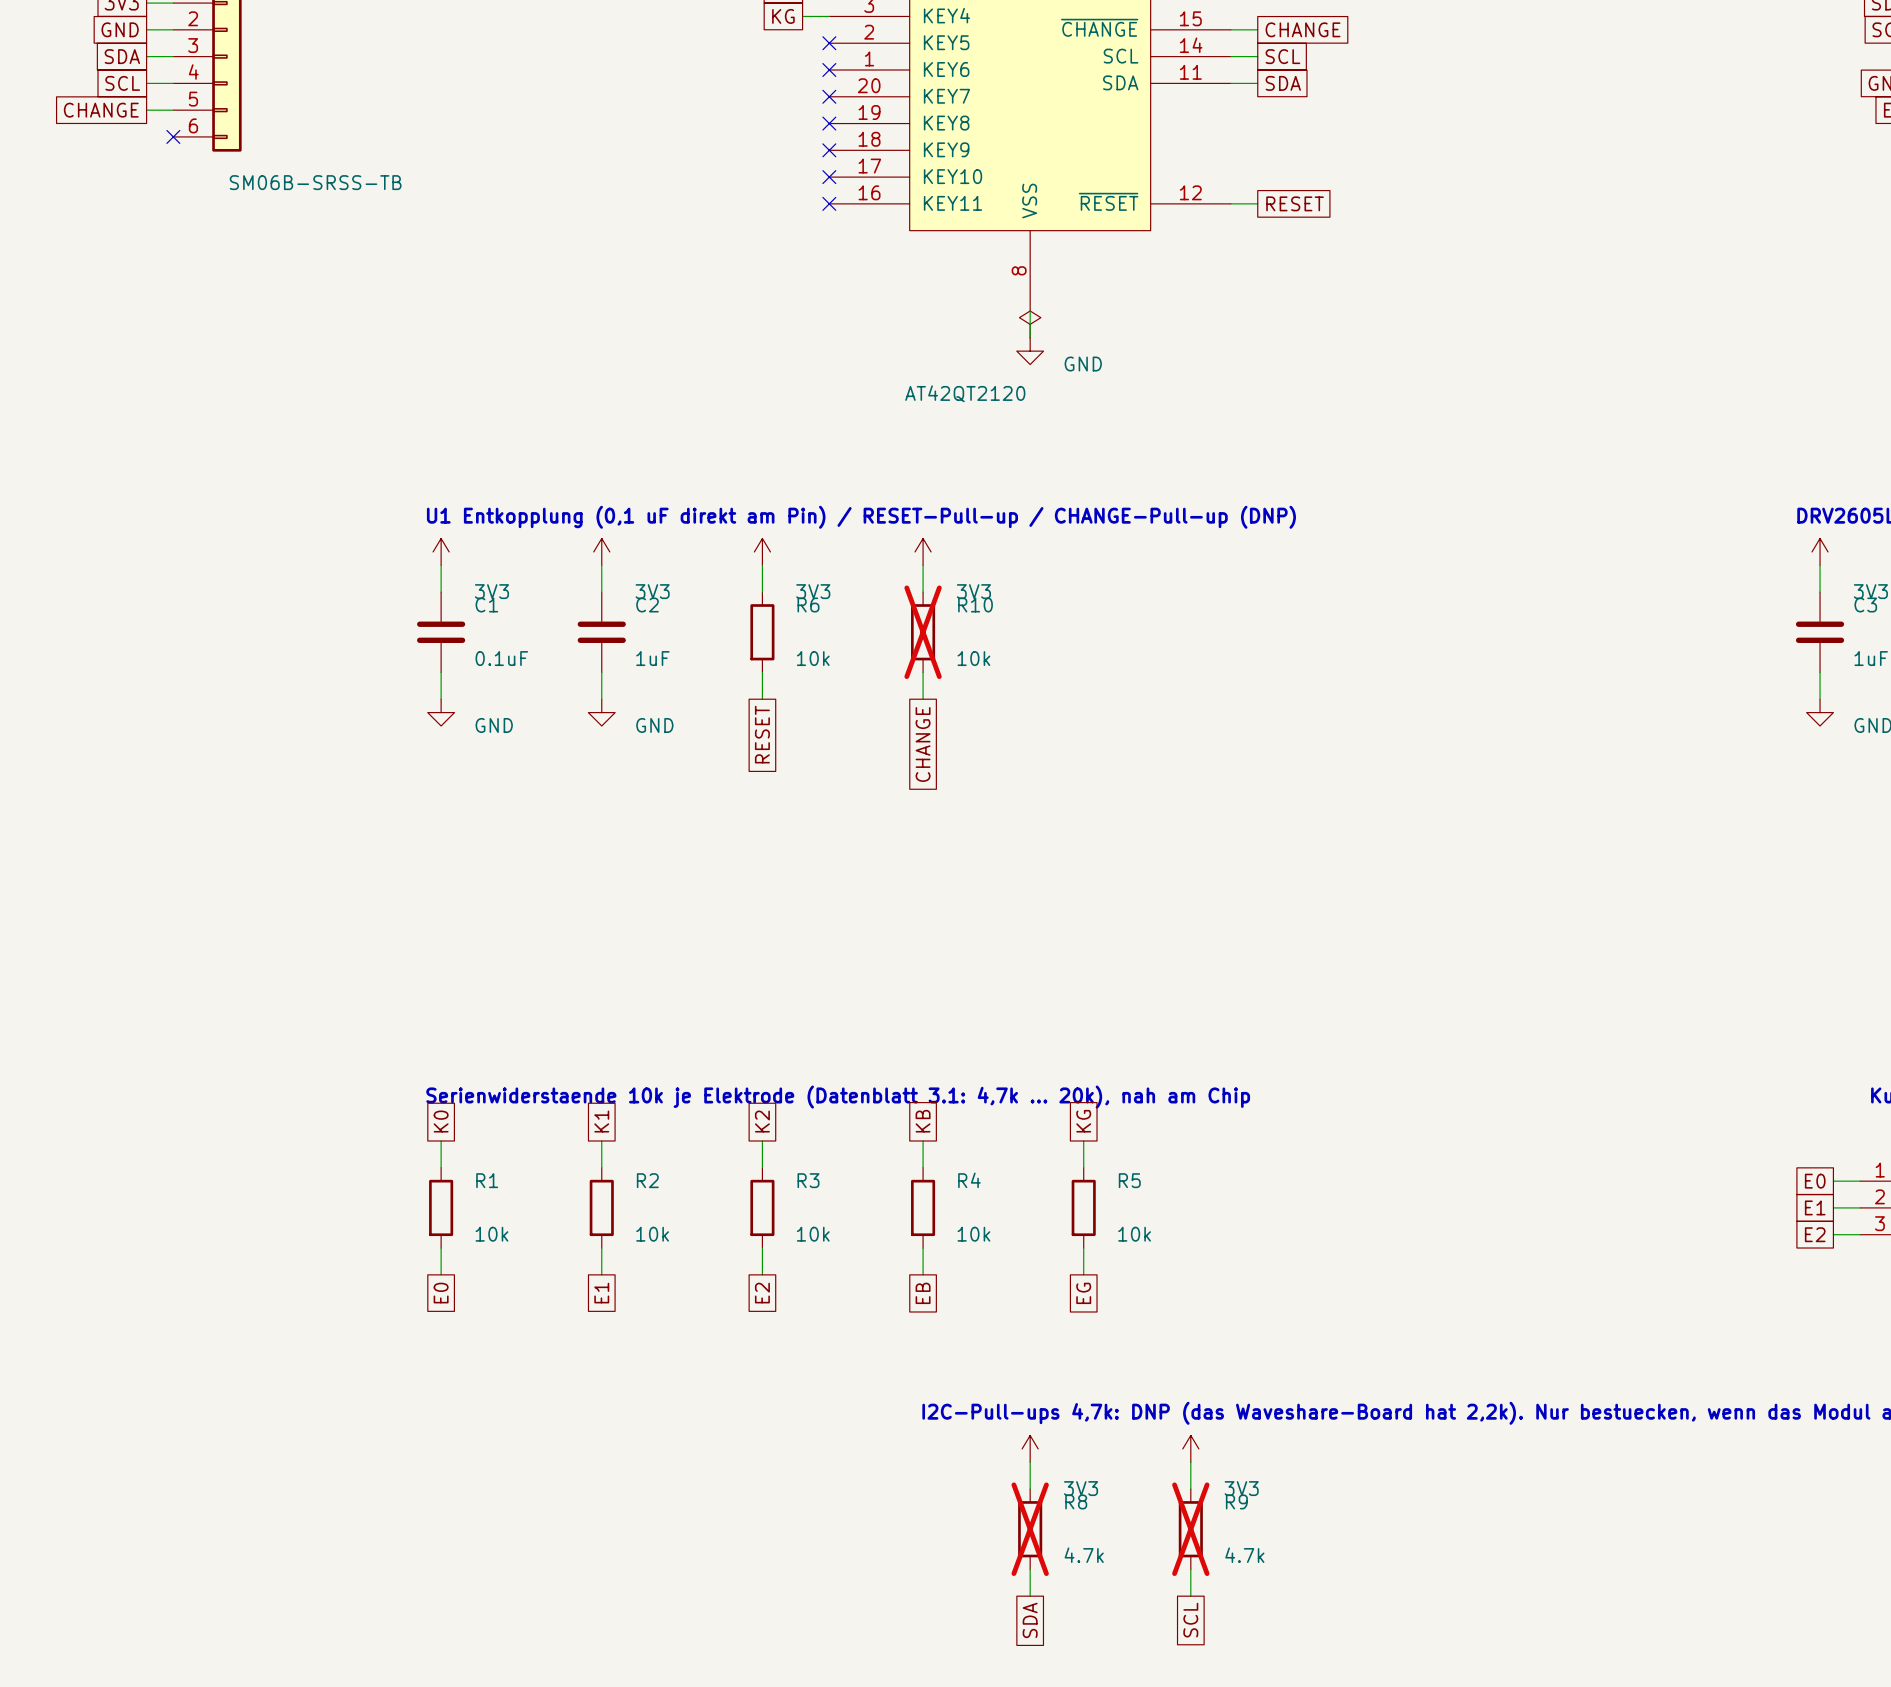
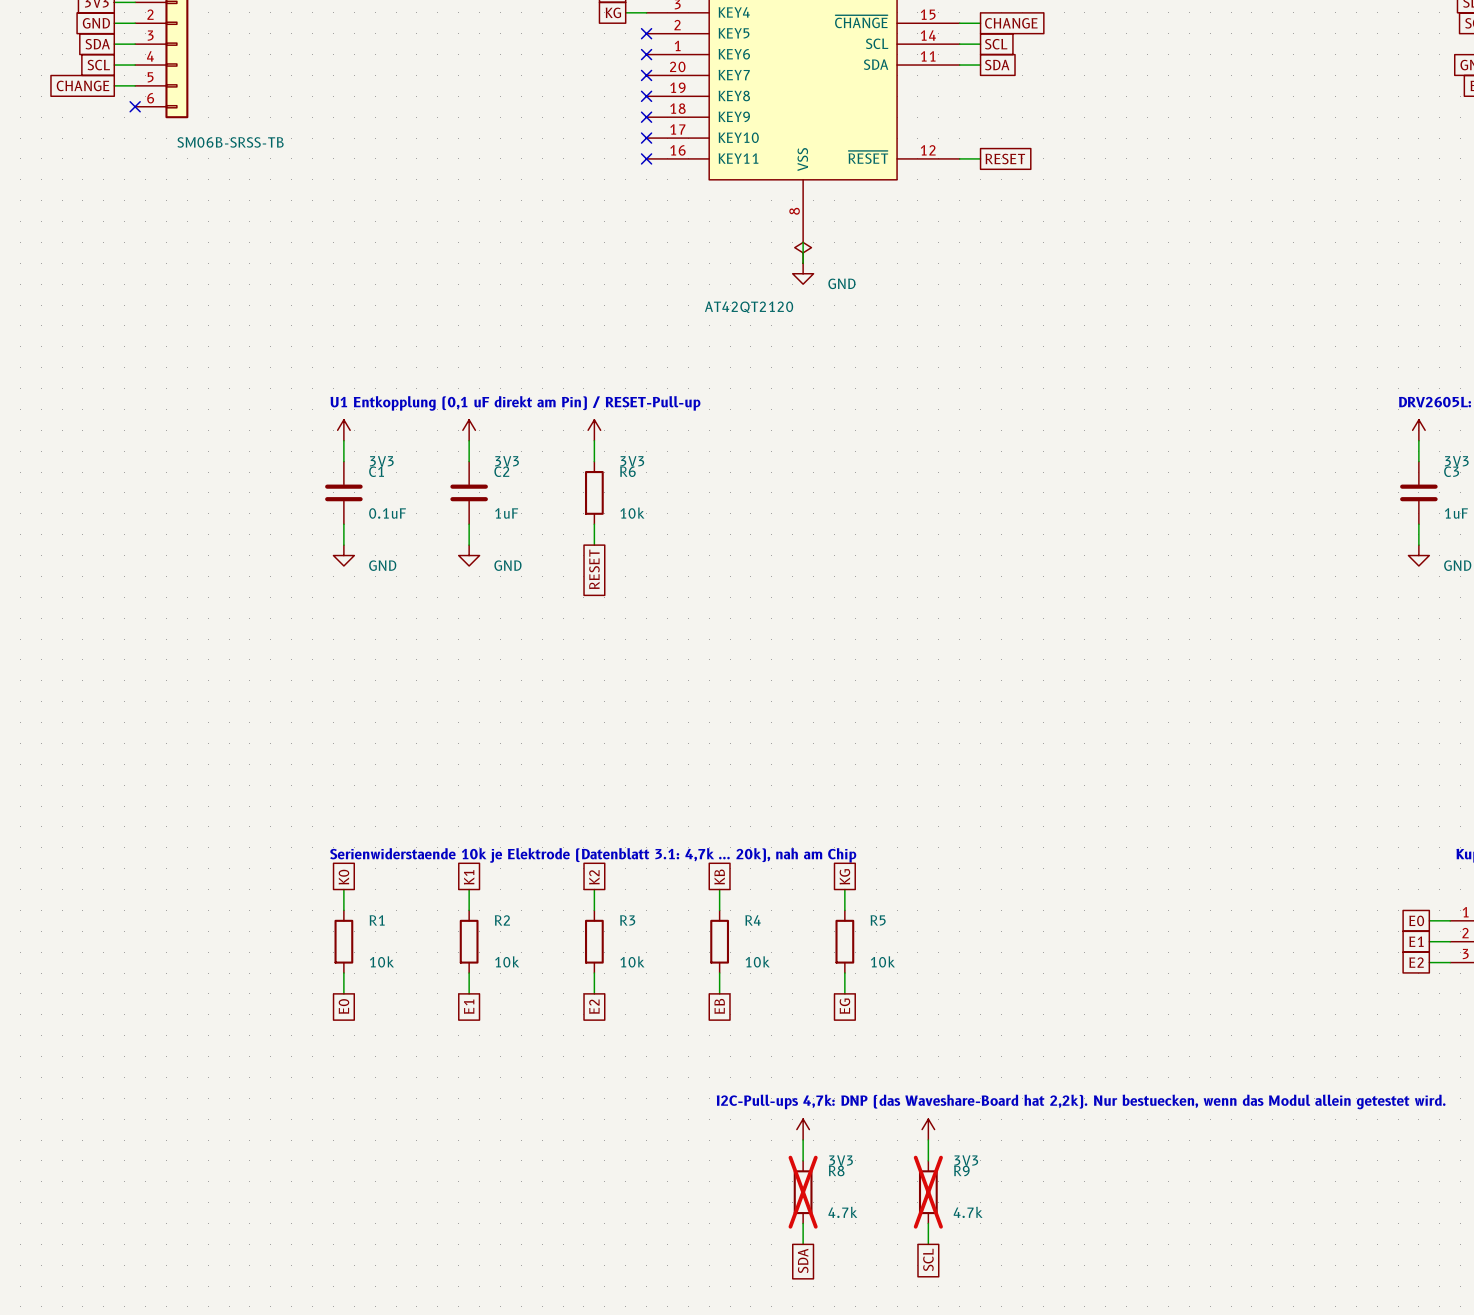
text: U1 Entkopplung (0,1 uF direkt am Pin) / RESET-Pull-up / CHANGE-Pull-up (DNP) (861, 517) -> U1 Entkopplung (0,1 uF direkt am Pin) / RESET-Pull-up (515, 403)
power symbol: 3V3 (923, 551) -> none
wire: (923, 565) (923, 592) -> none
R10: 10k (923, 632) -> none
wire: (923, 672) (923, 699) -> none
global label: CHANGE (923, 744) -> none

